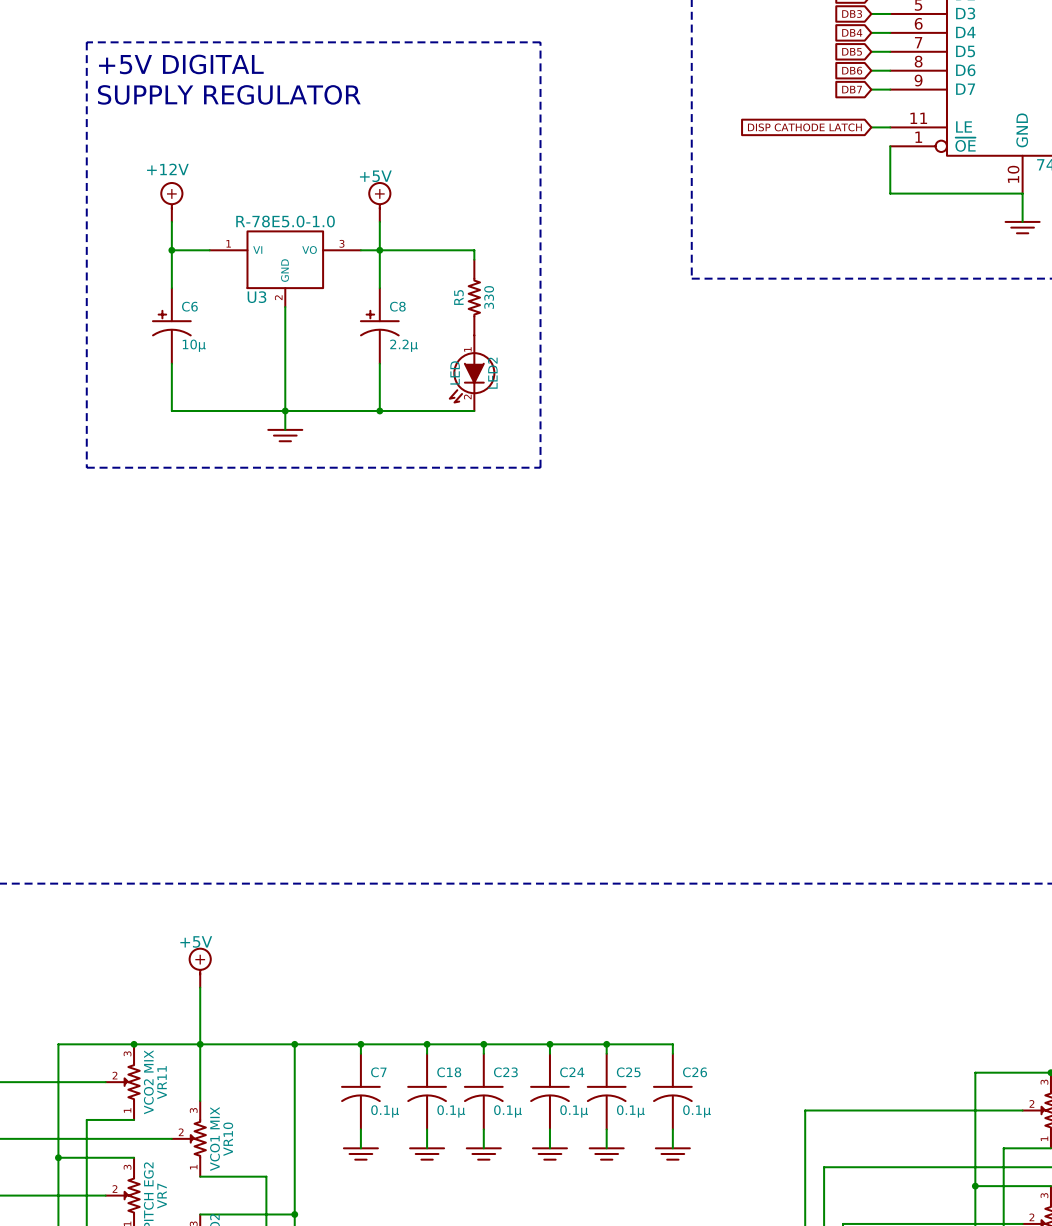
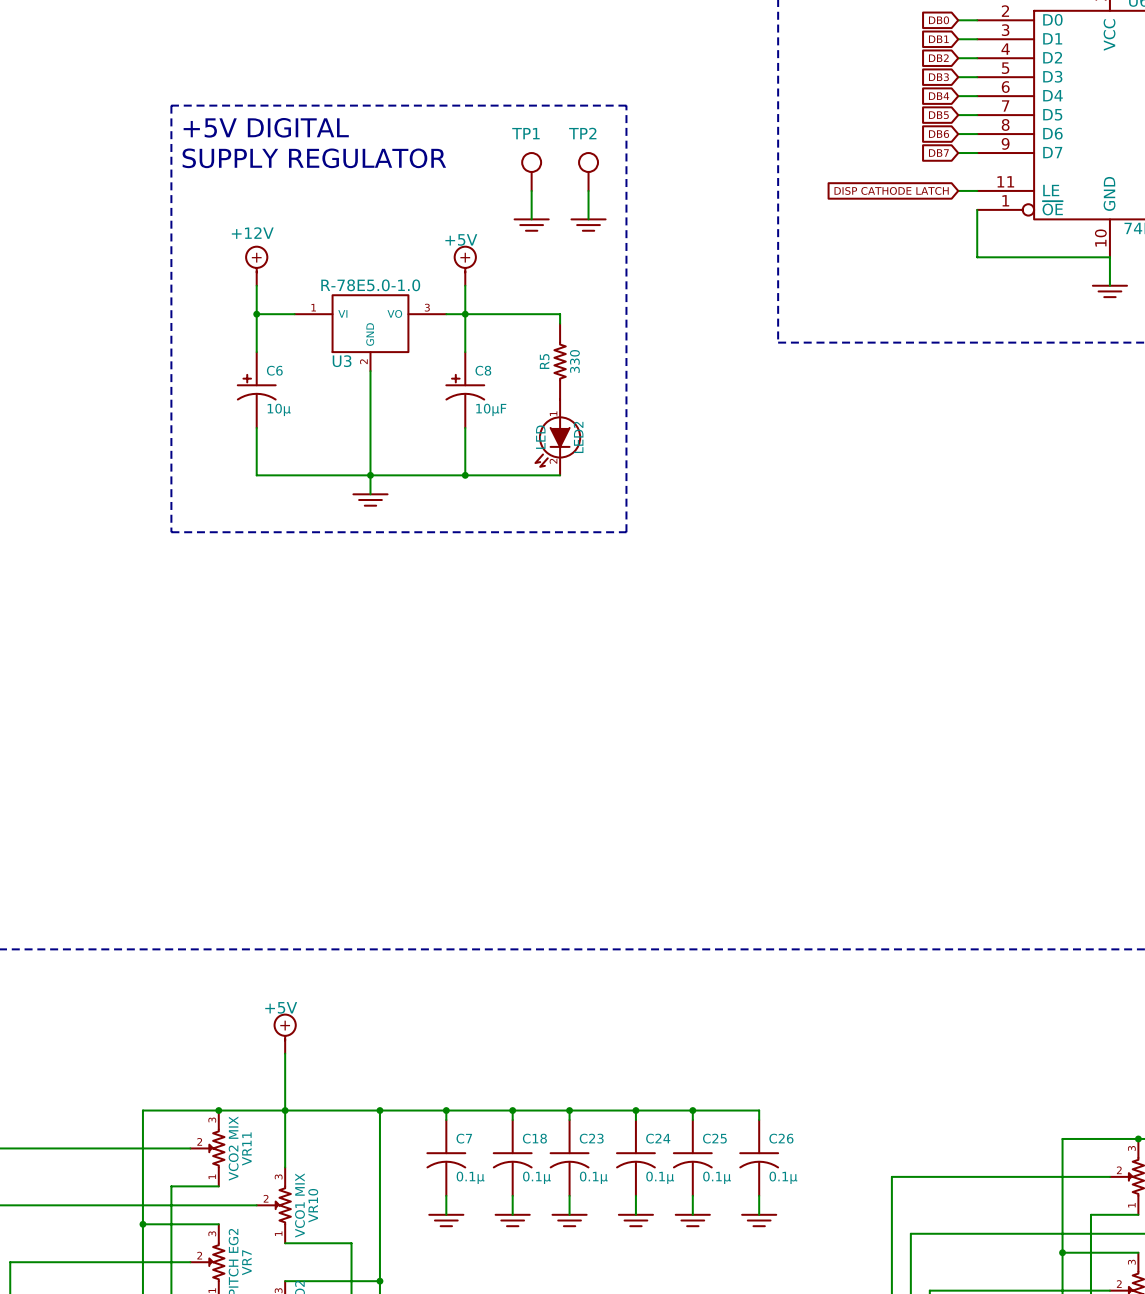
TP1: none -> (531, 171)
TP2: none -> (588, 171)
wire: none -> (531, 190) (531, 219)
wire: none -> (588, 190) (588, 219)
power symbol: none -> (531, 225)
power symbol: none -> (588, 225)
C8 value: 2.2µ (404, 345) -> 10µF (491, 409)

